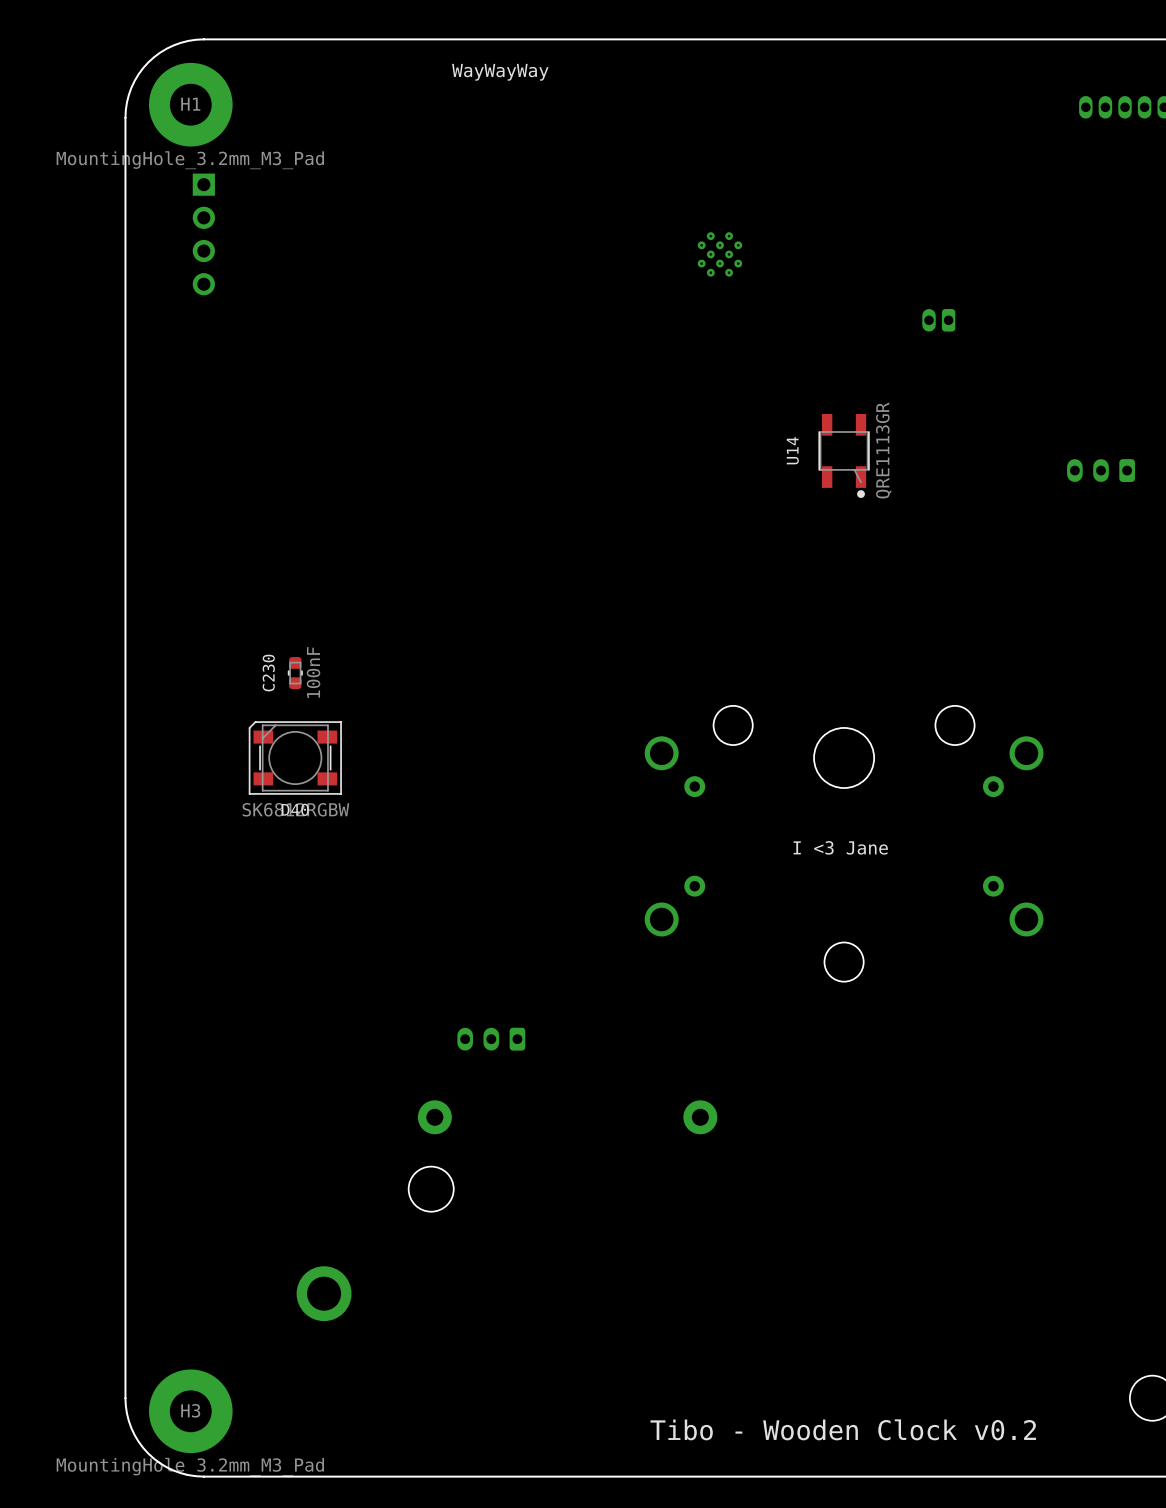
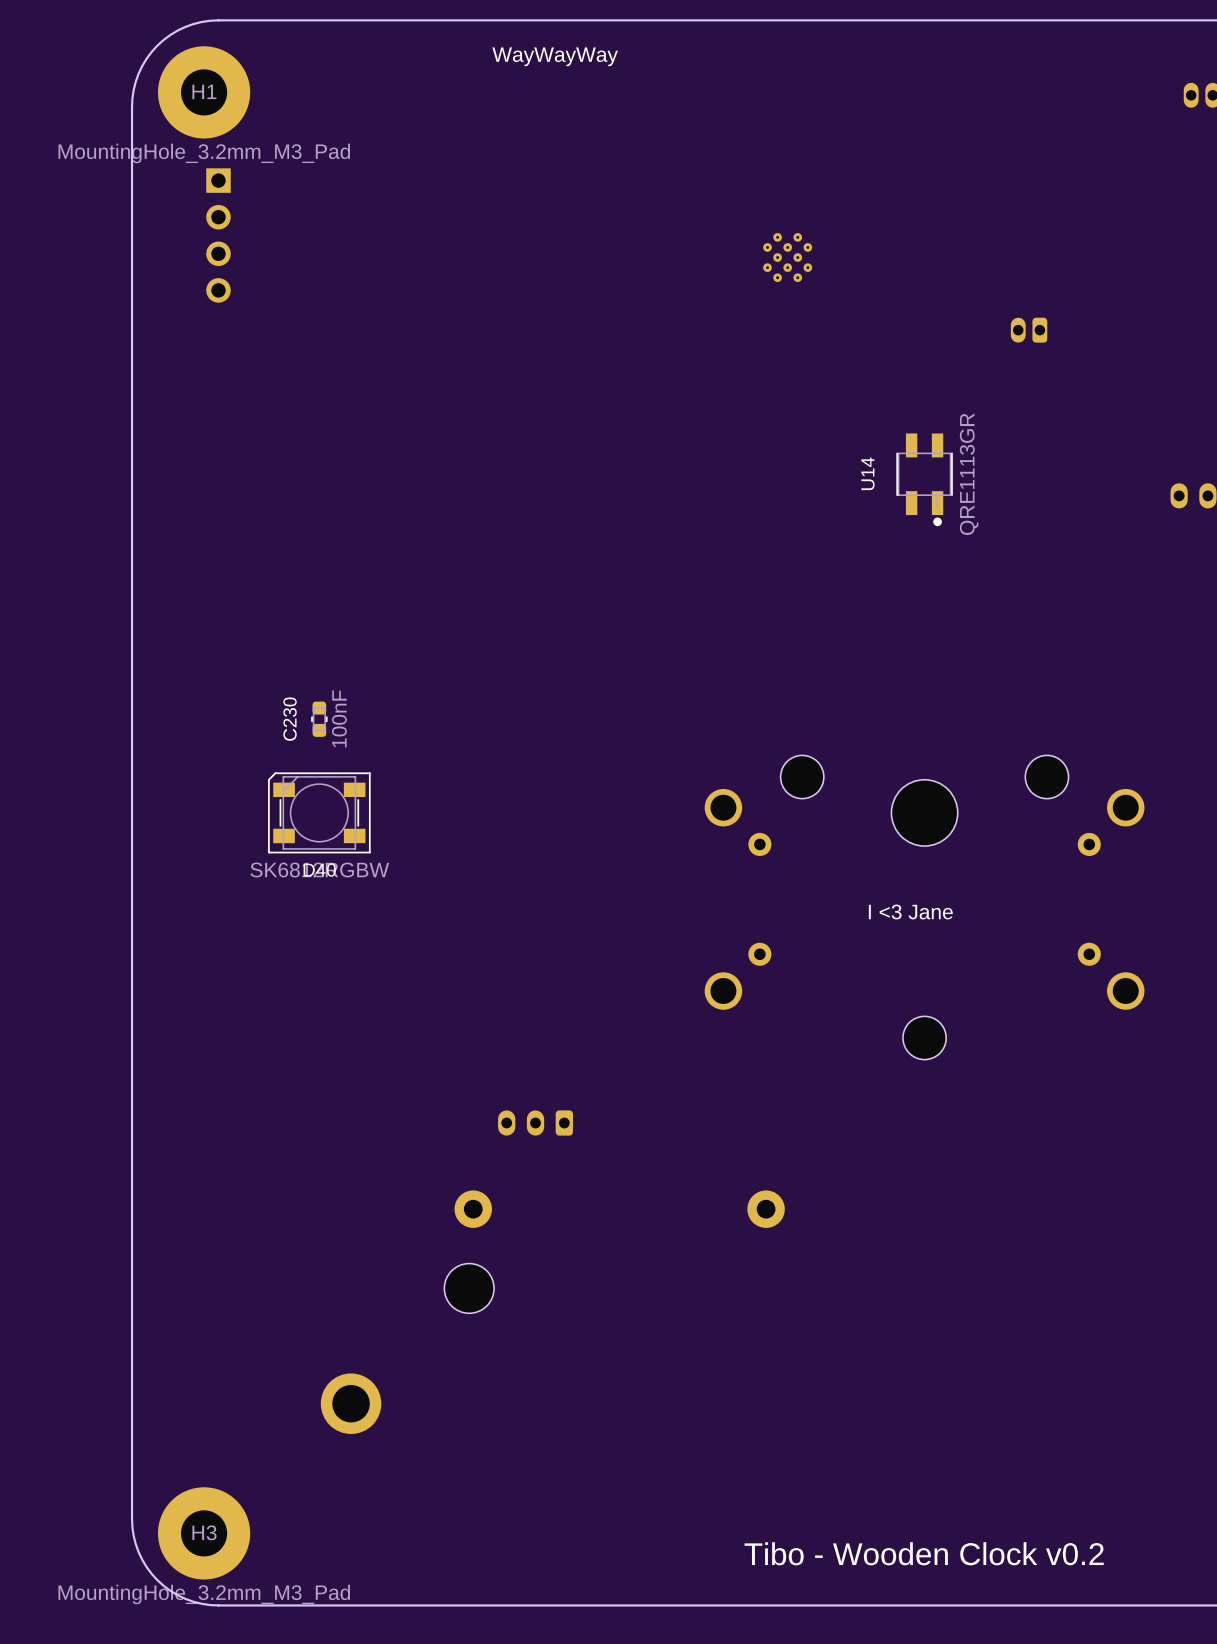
U14 footprint: [818, 413, 870, 498] -> [896, 433, 953, 527]

